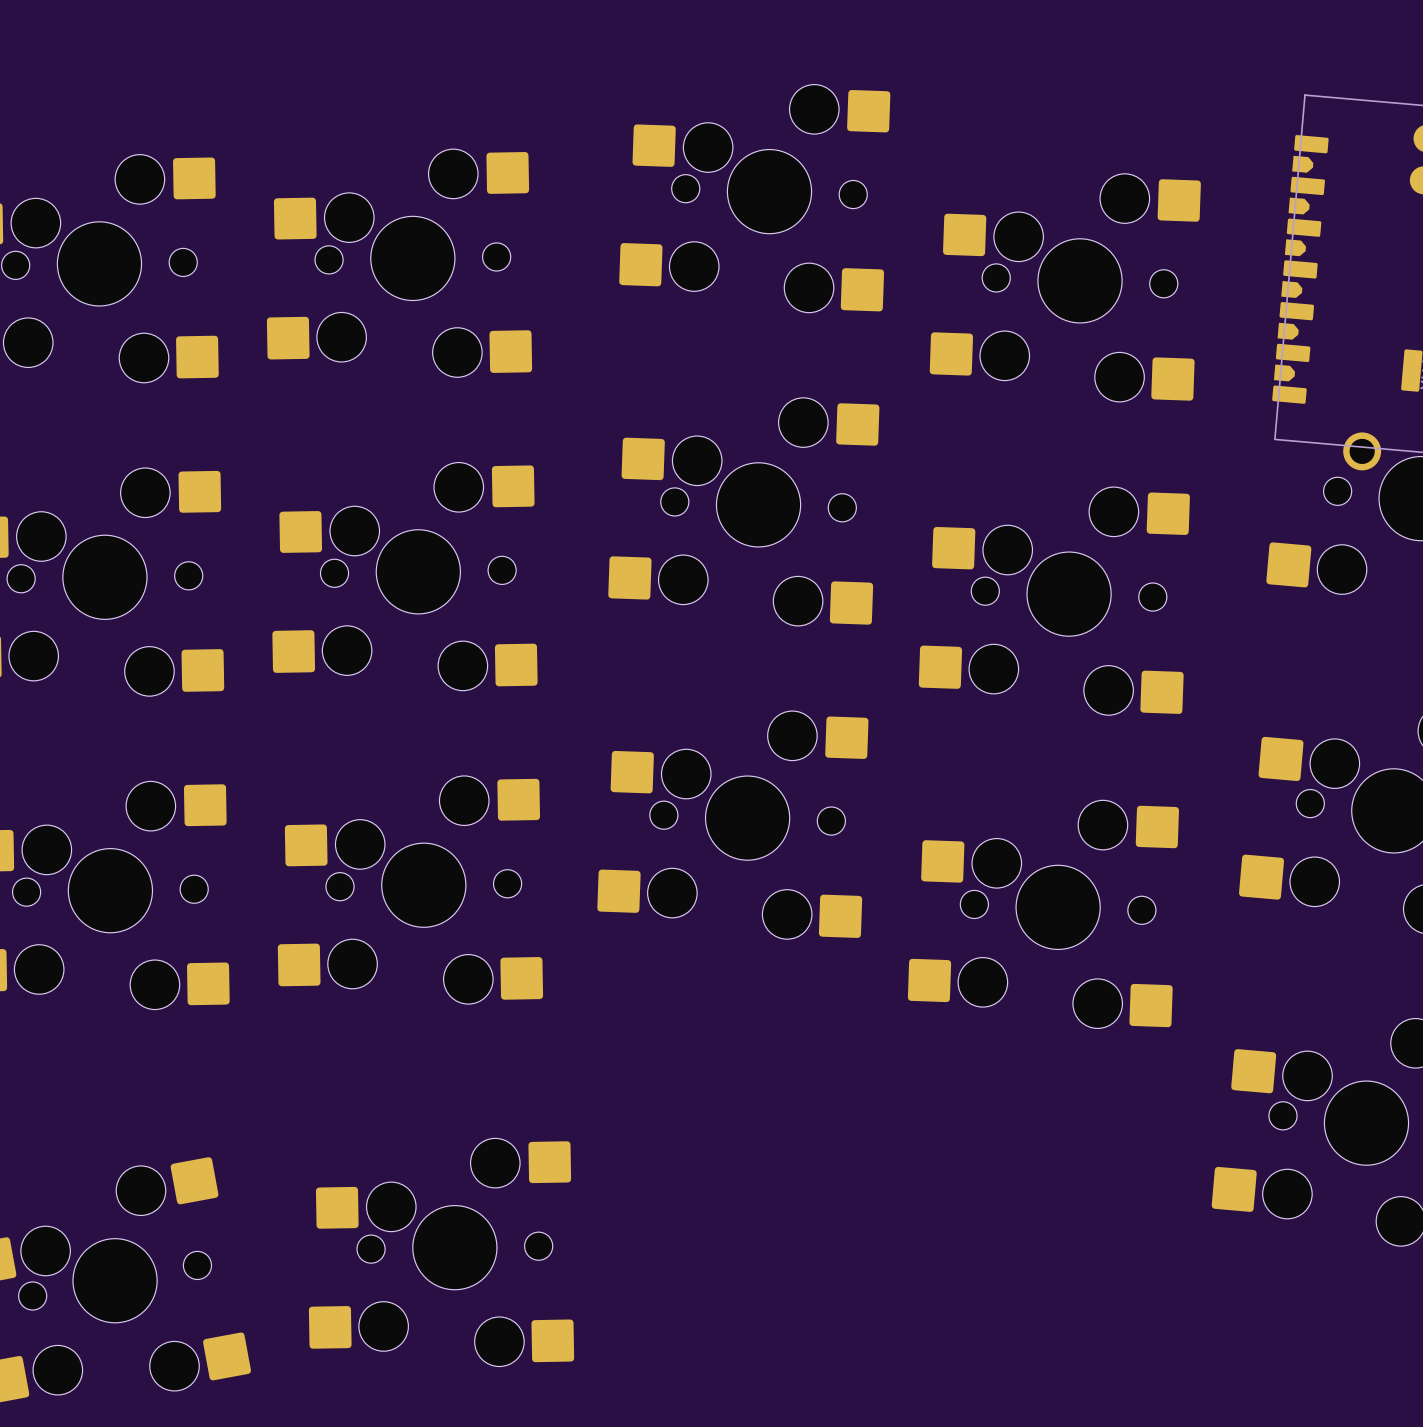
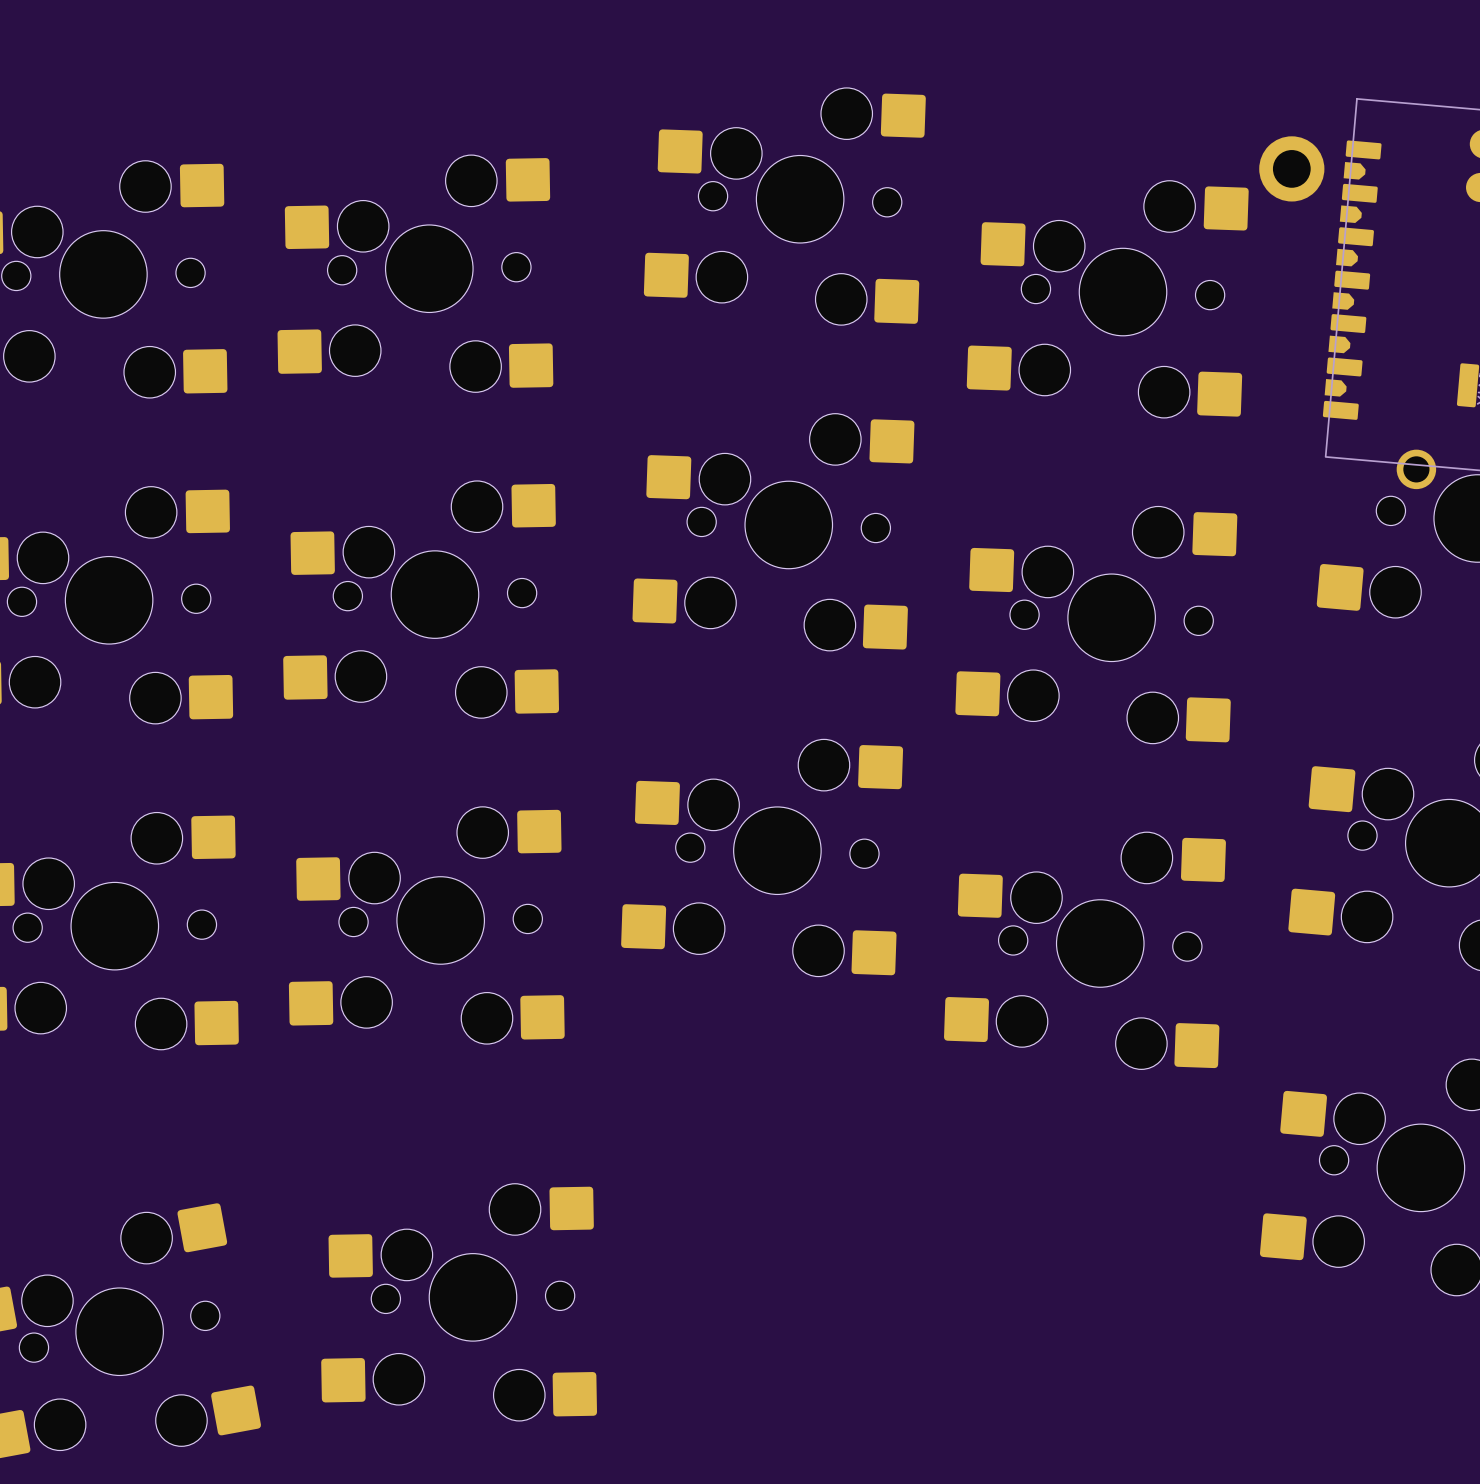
part: none -> (1291, 168)

